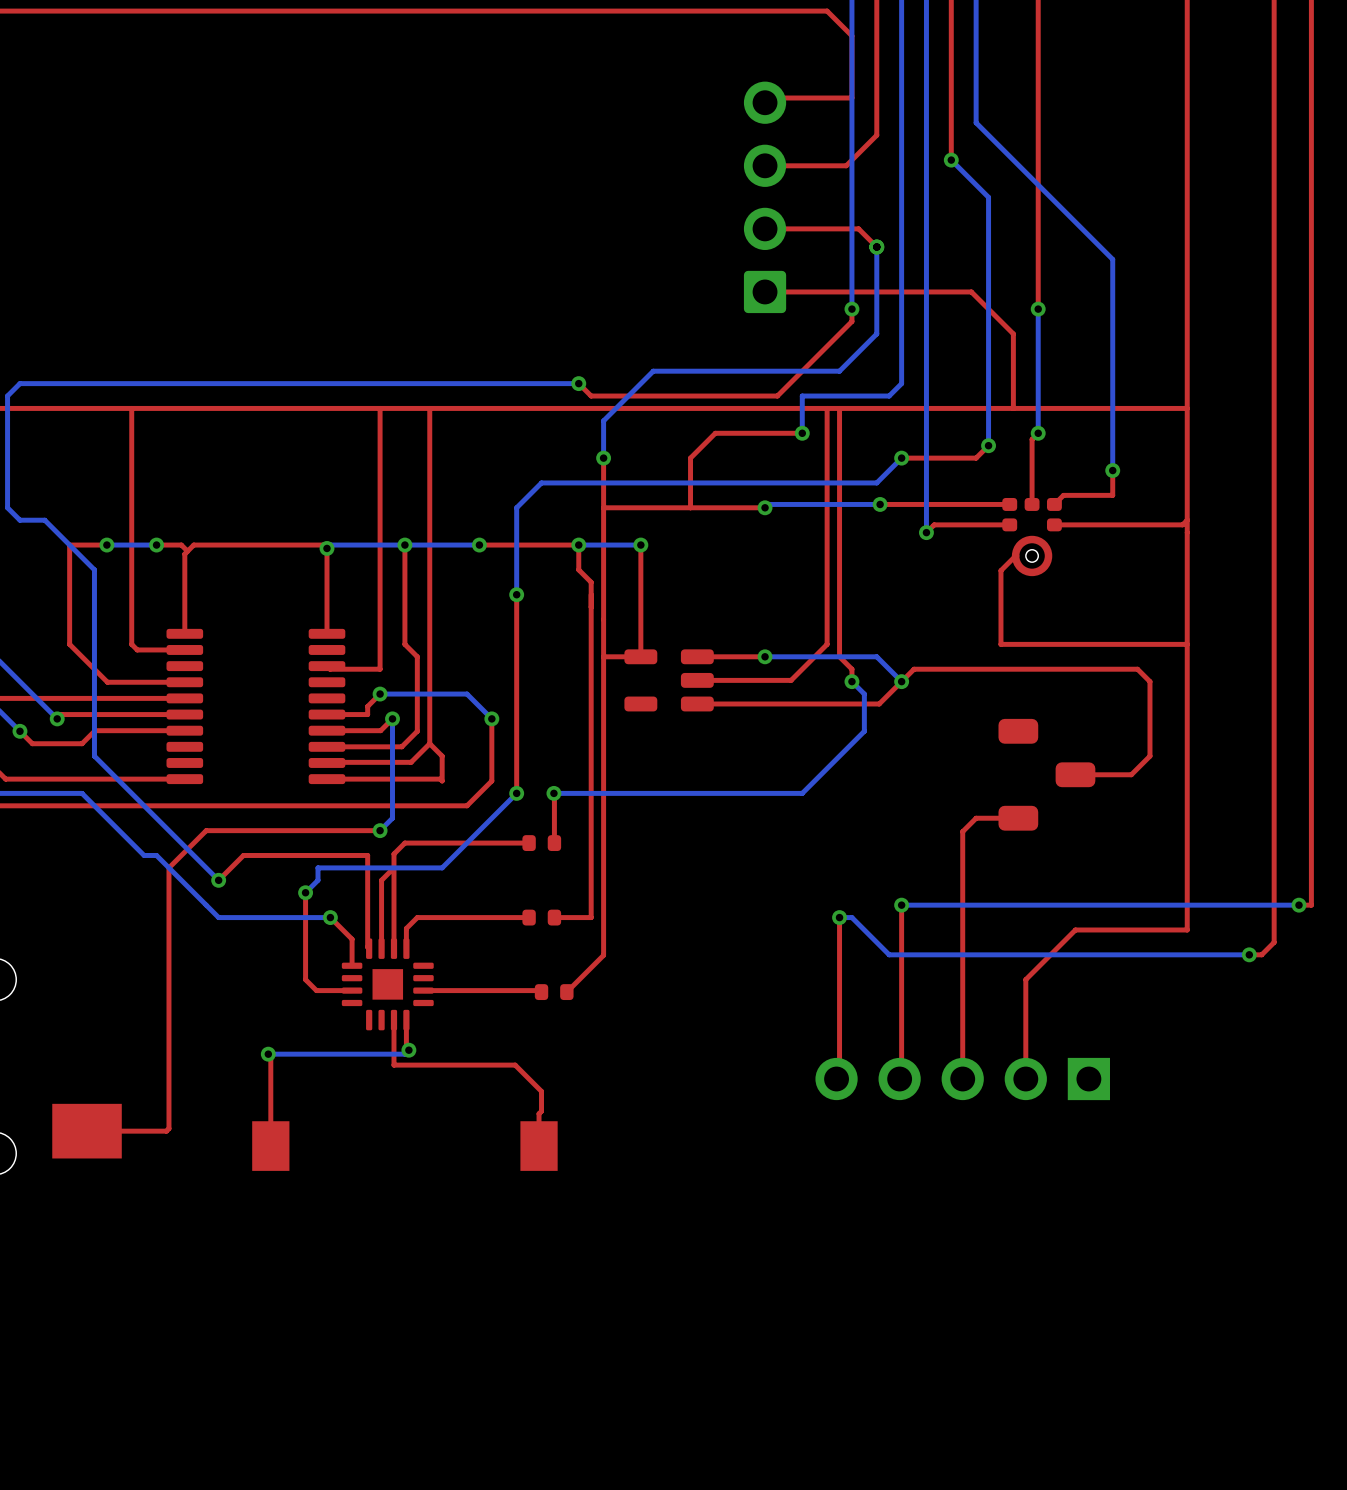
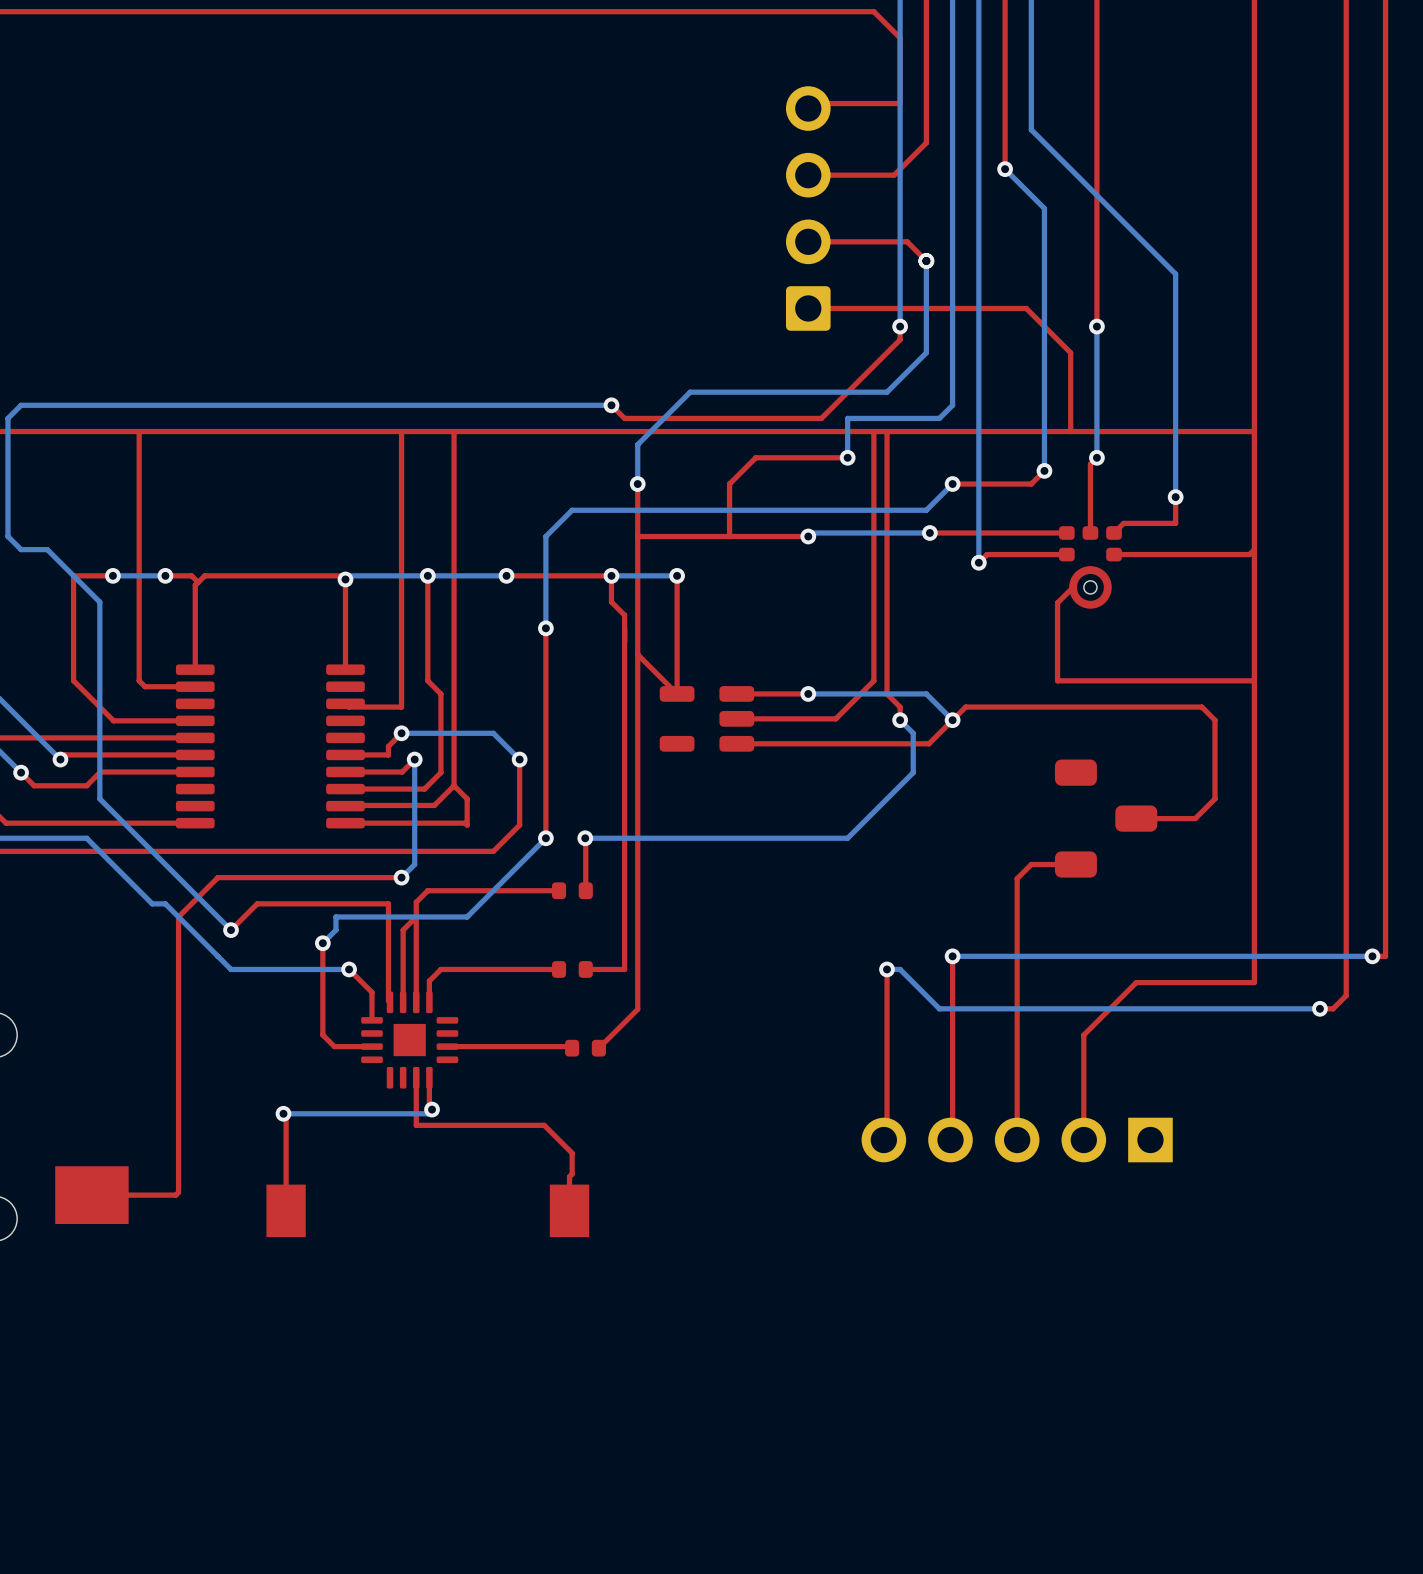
top track: (640, 656) (603, 656) -> (677, 693) (637, 654)

